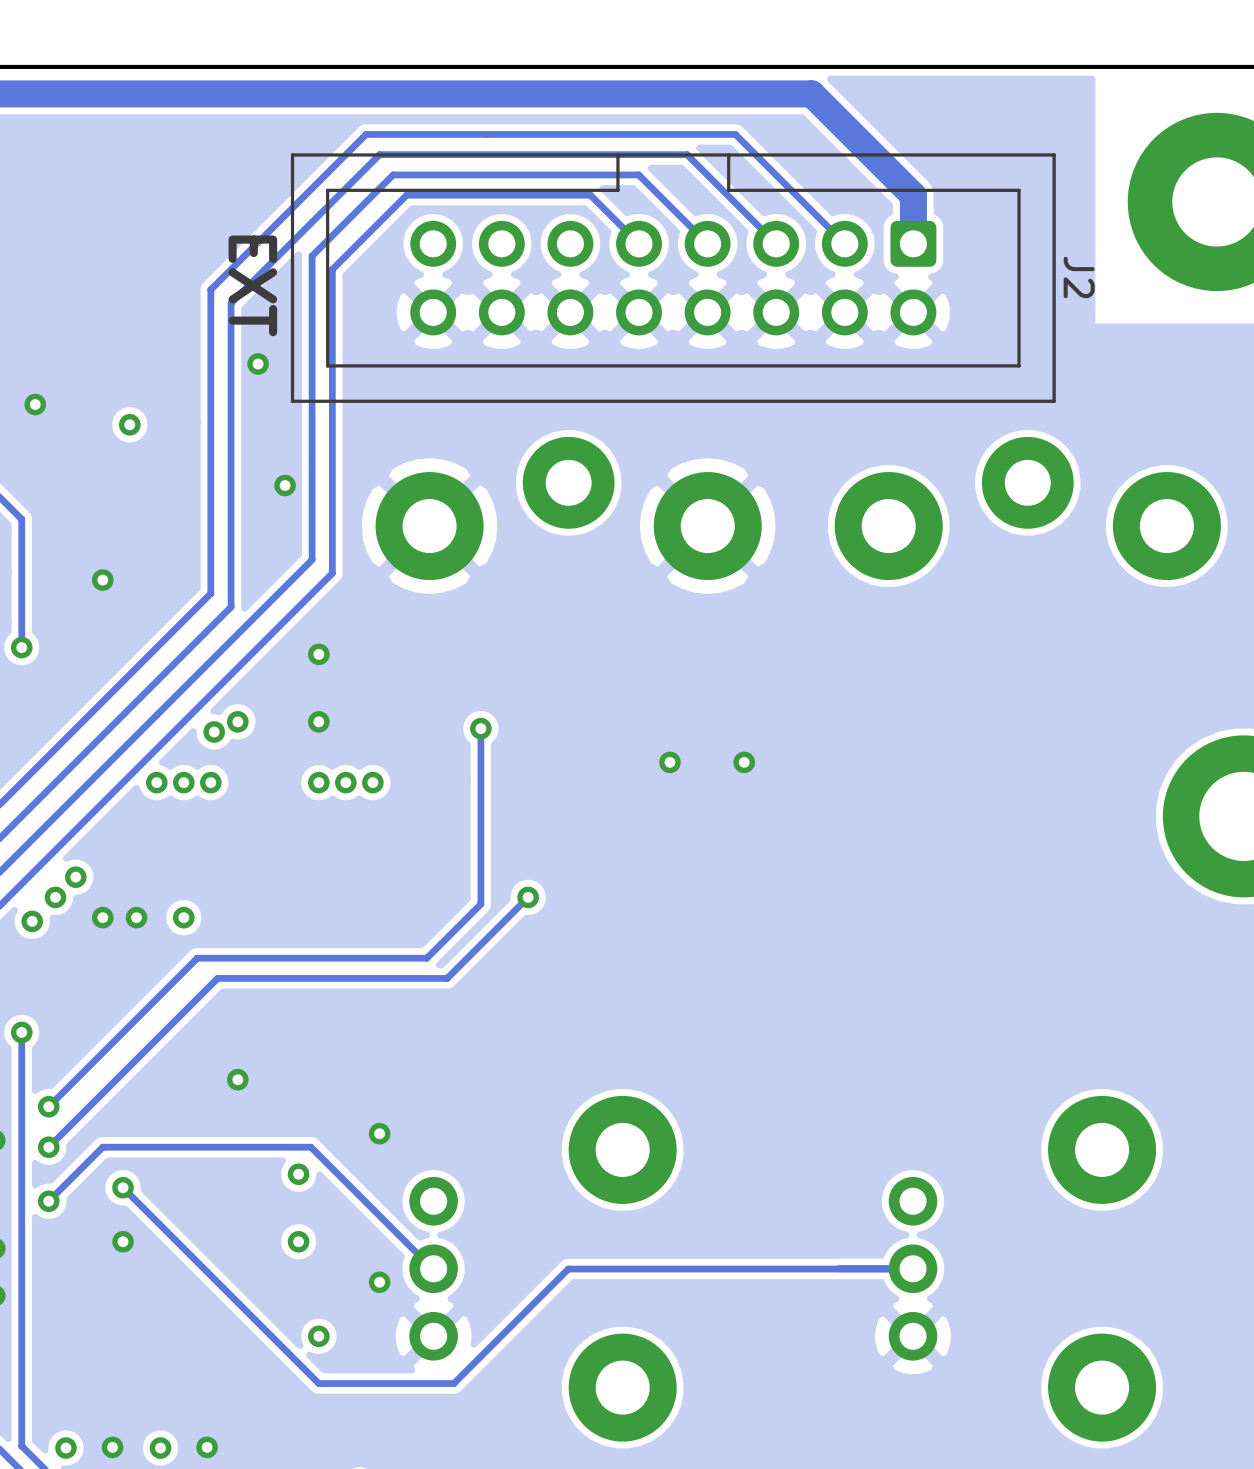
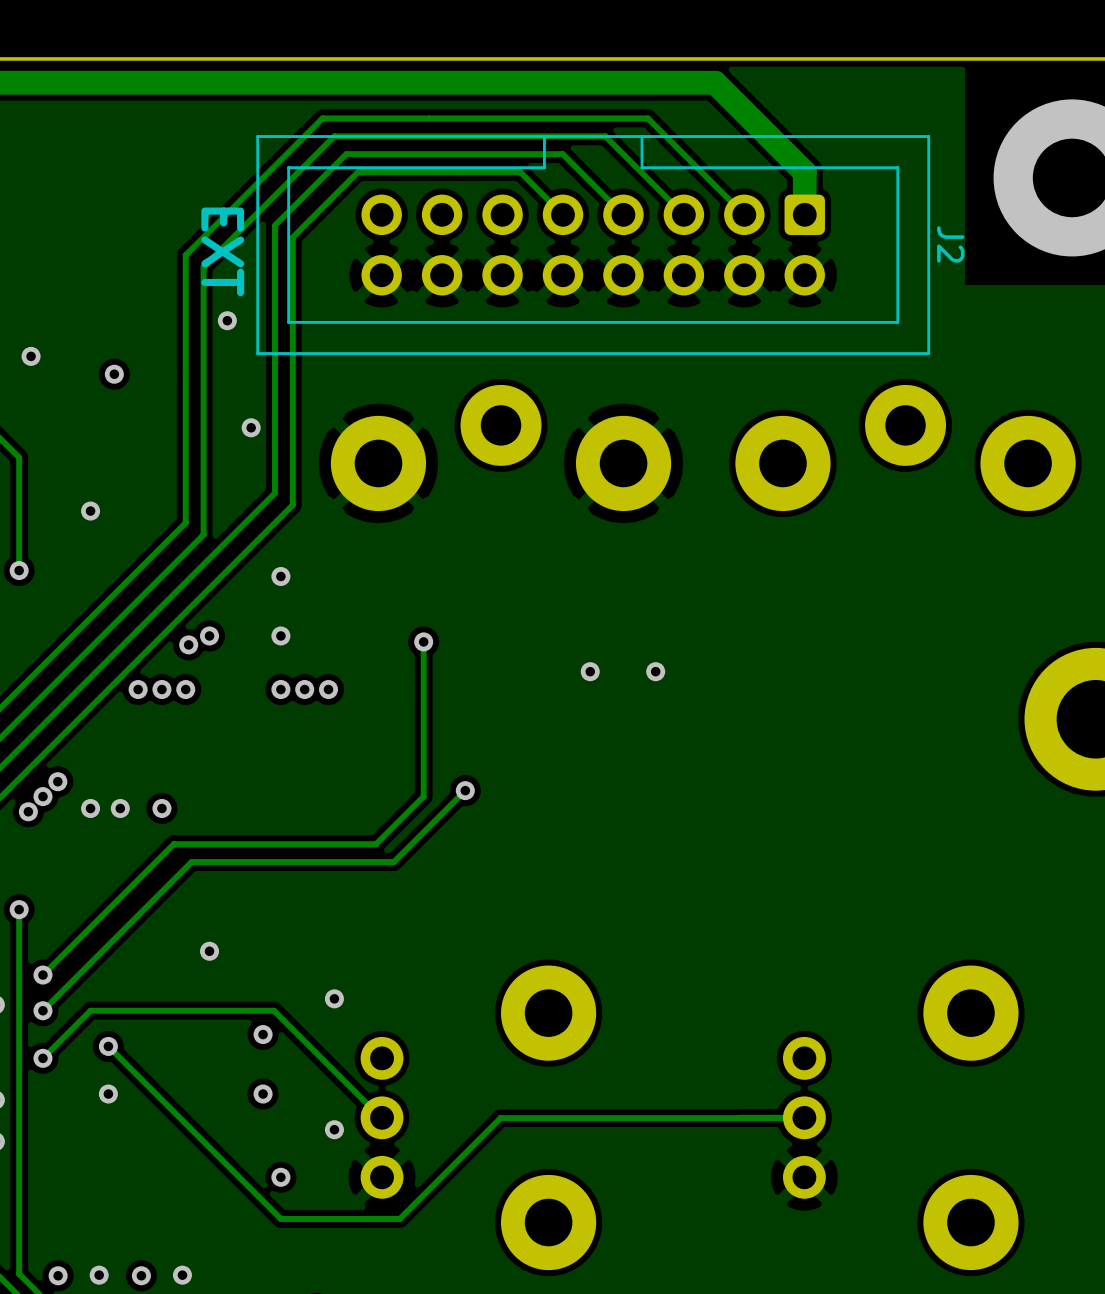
via: (75, 877) -> none
via: none -> (57, 781)
via: (55, 897) -> none
via: none -> (42, 796)

